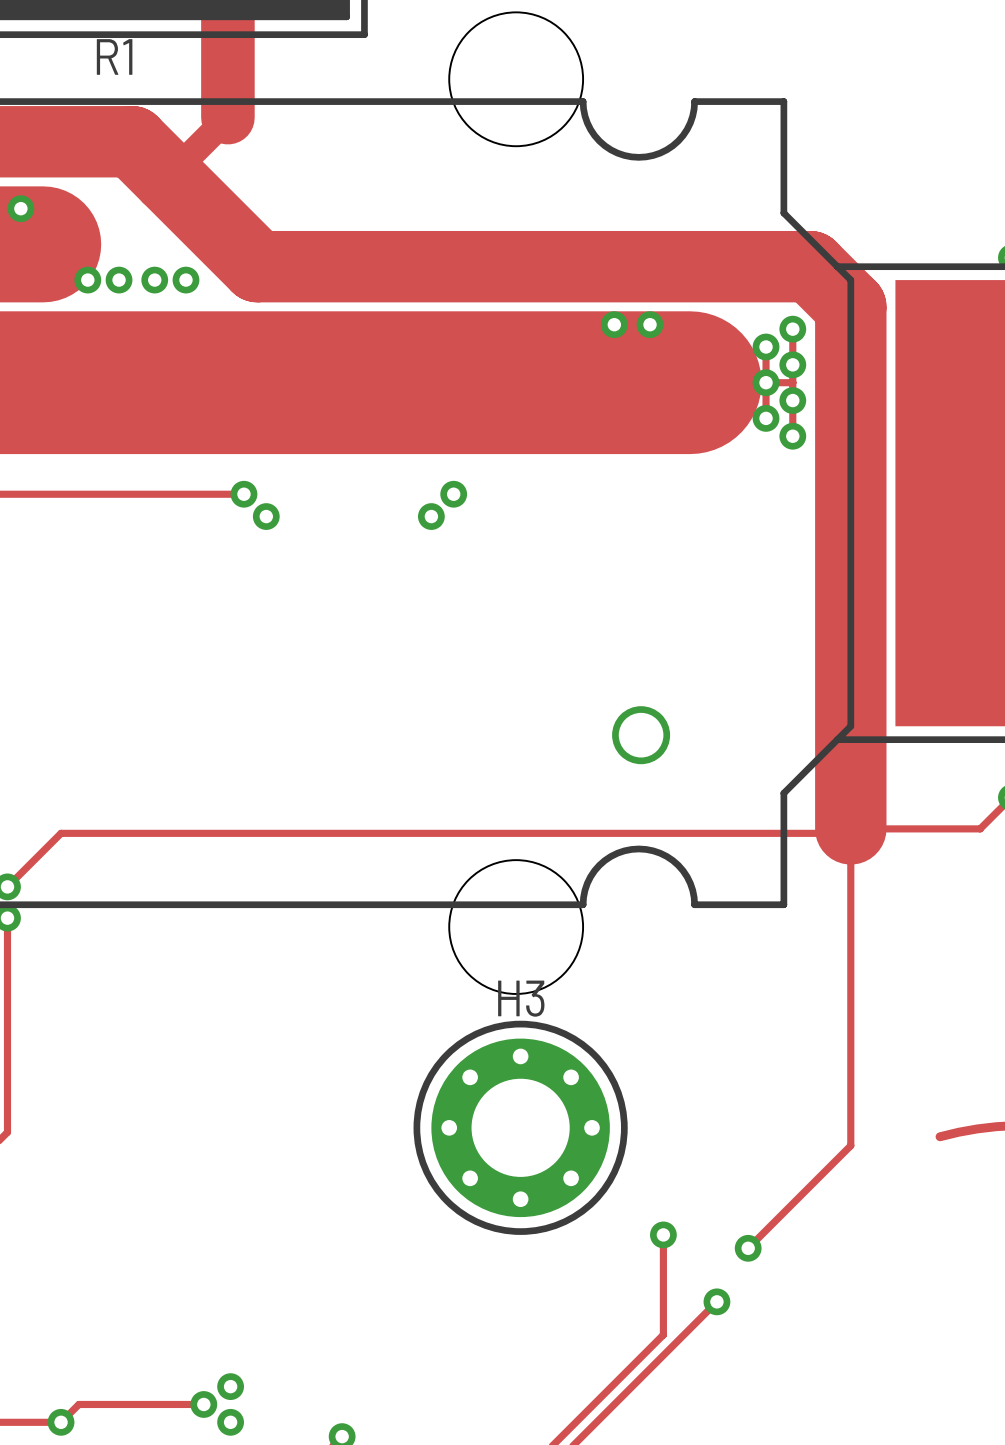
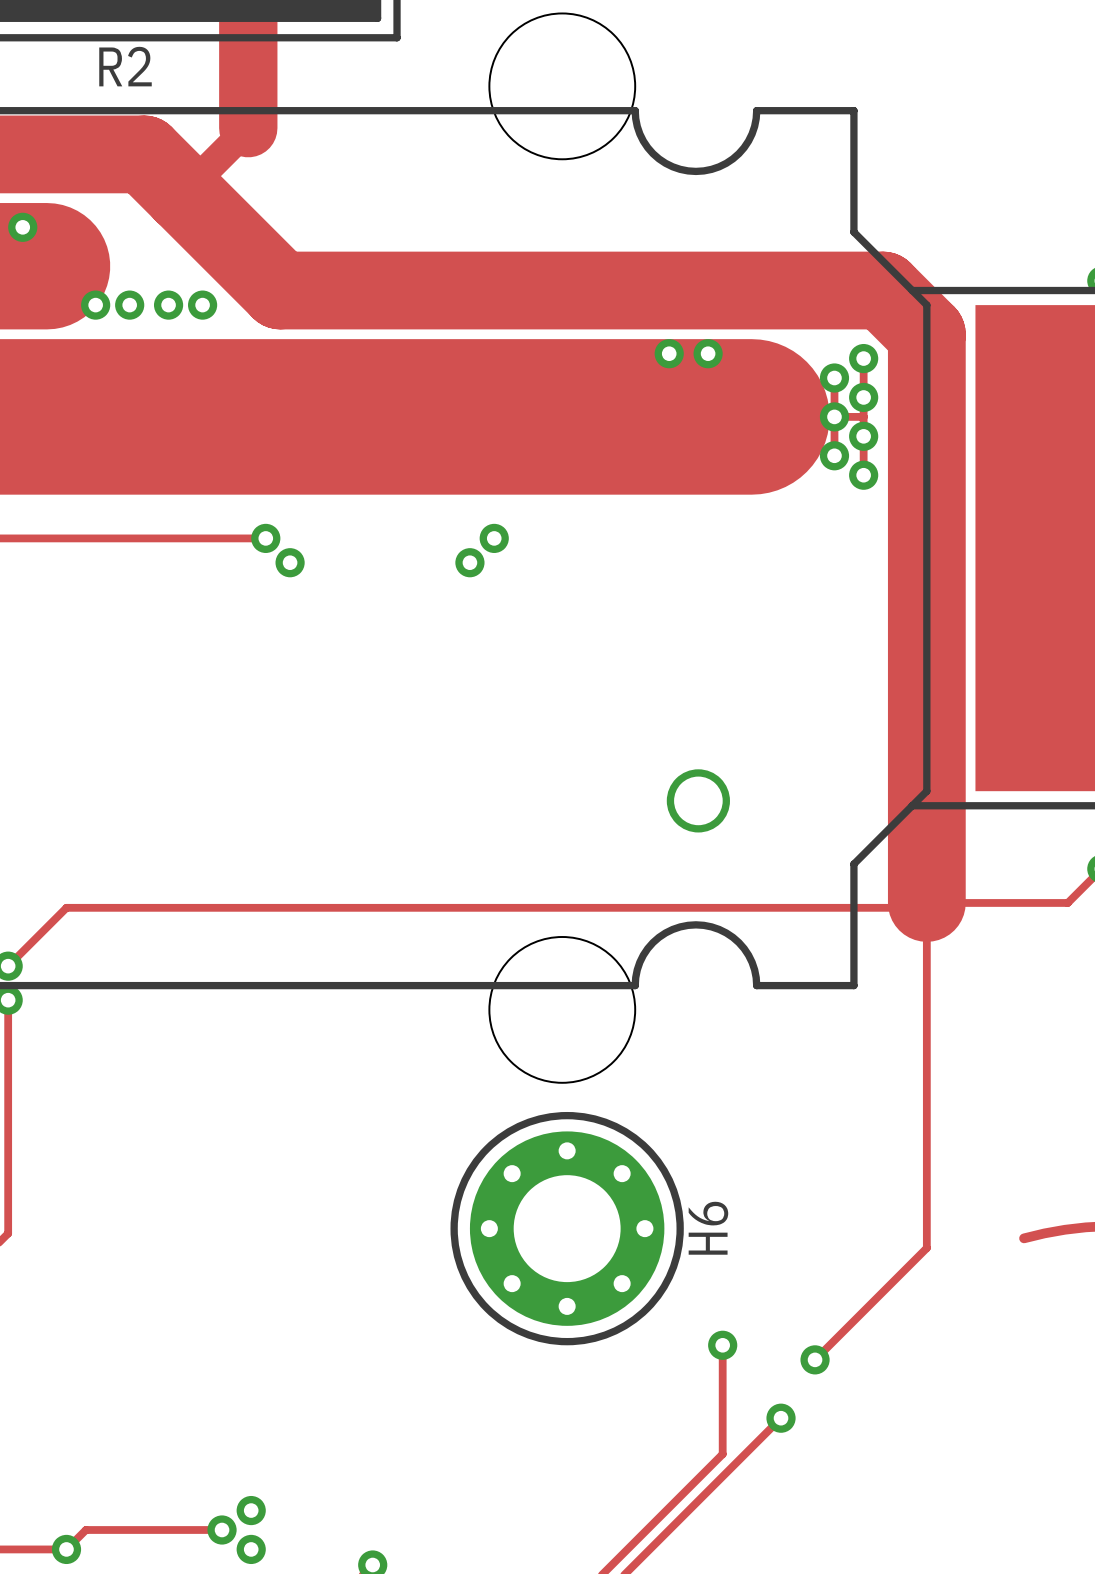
R1 name: R1 (114, 56) -> R2 (125, 66)
H3 name: H3 (521, 998) -> H6 (708, 1228)

